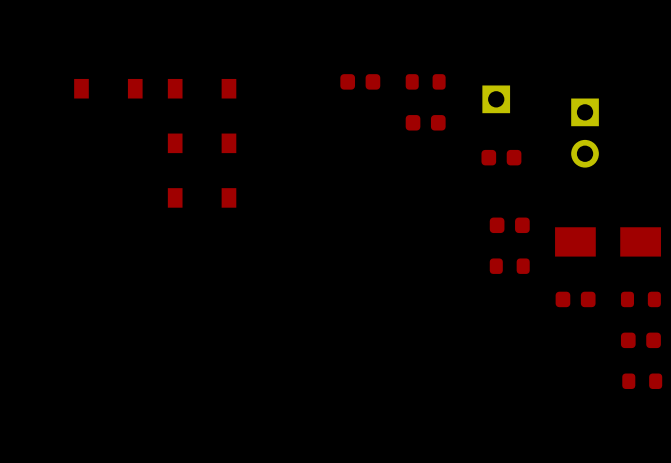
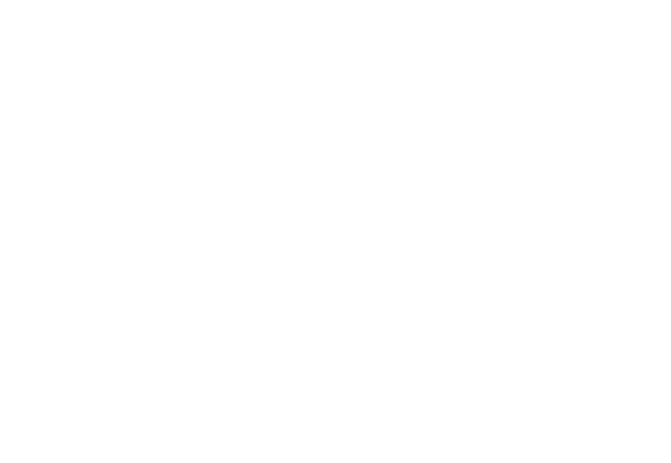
part: (360, 81) -> none
part: (425, 81) -> none
part: (108, 88) -> none
part: (202, 88) -> none
part: (496, 99) -> none
part: (425, 122) -> none
part: (585, 133) -> none
part: (202, 143) -> none
part: (501, 157) -> none
part: (202, 197) -> none
part: (509, 225) -> none
part: (608, 241) -> none
part: (509, 266) -> none
part: (575, 299) -> none
part: (640, 299) -> none
part: (640, 340) -> none
part: (642, 381) -> none

